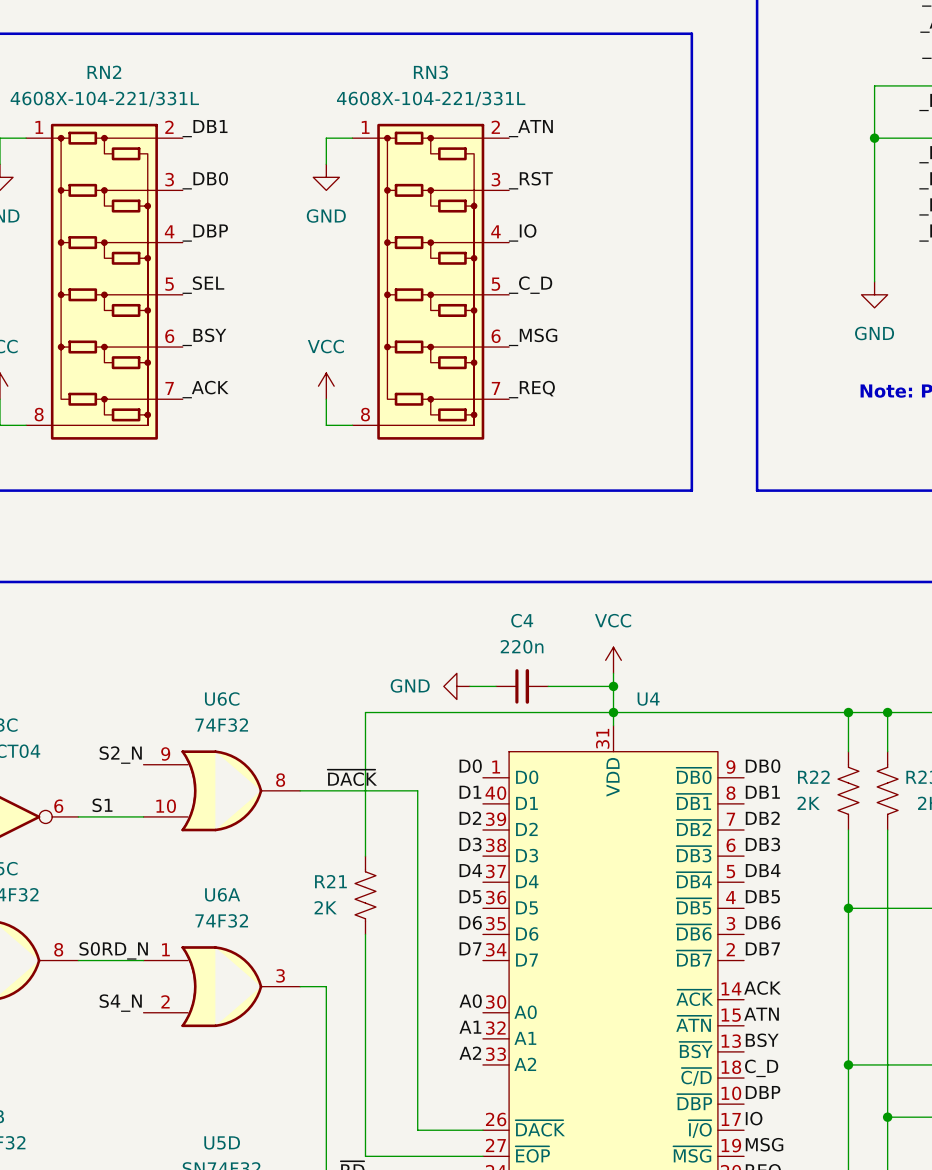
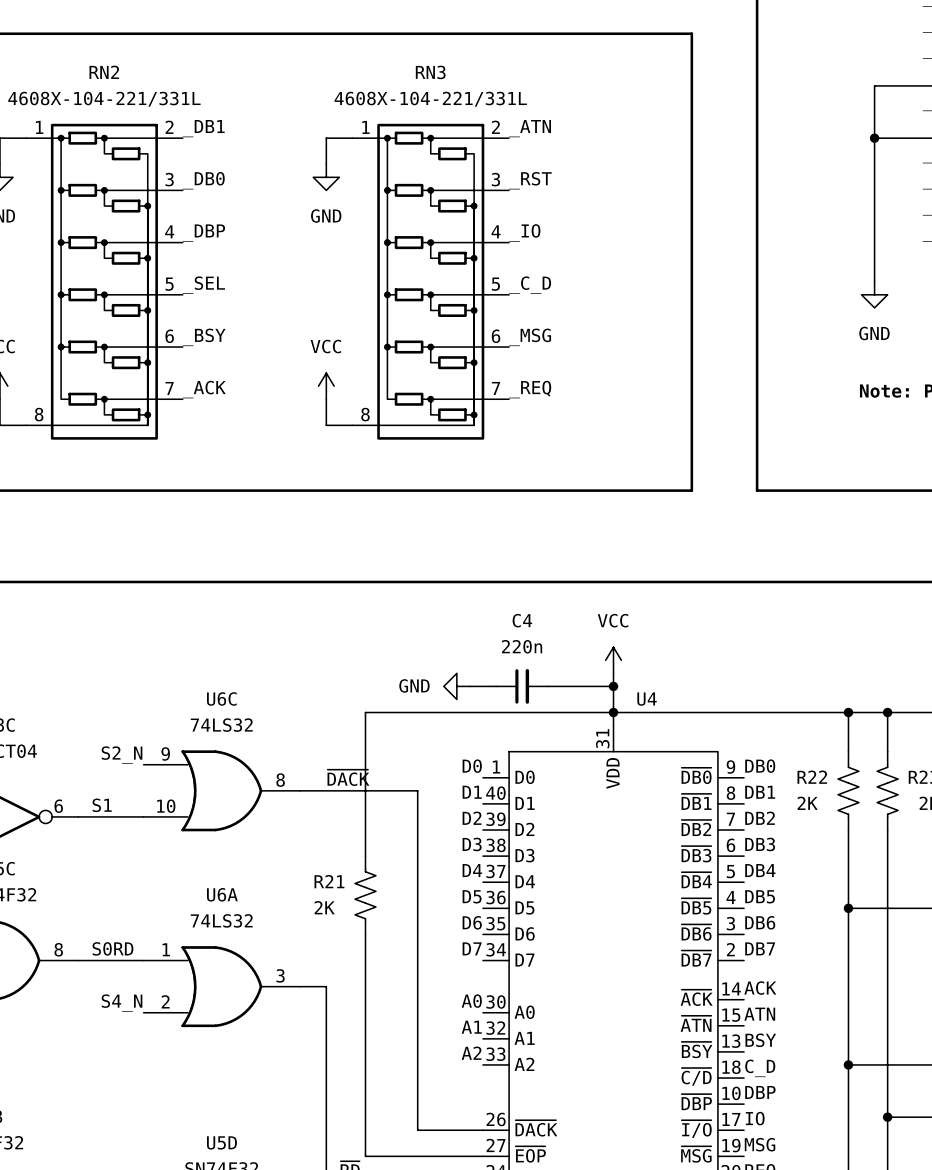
U6C value: 74F32 (221, 725) -> 74LS32 (221, 725)
U6A value: 74F32 (221, 920) -> 74LS32 (221, 920)
label: S0RD_N (113, 950) -> S0RD (112, 948)

